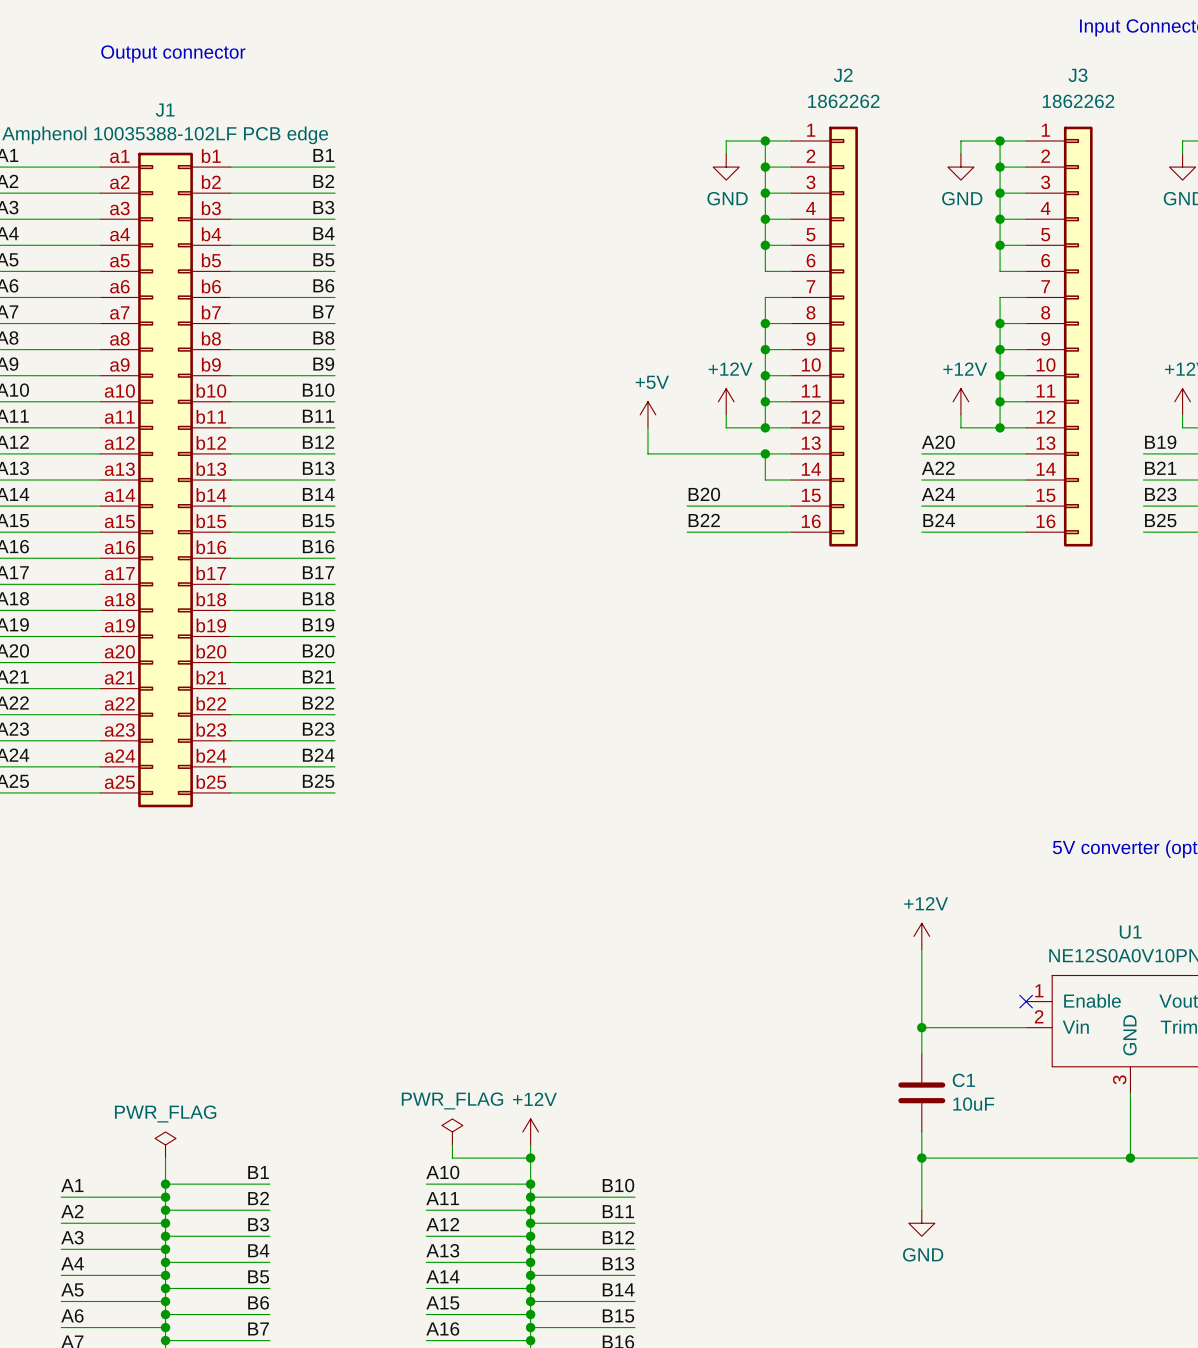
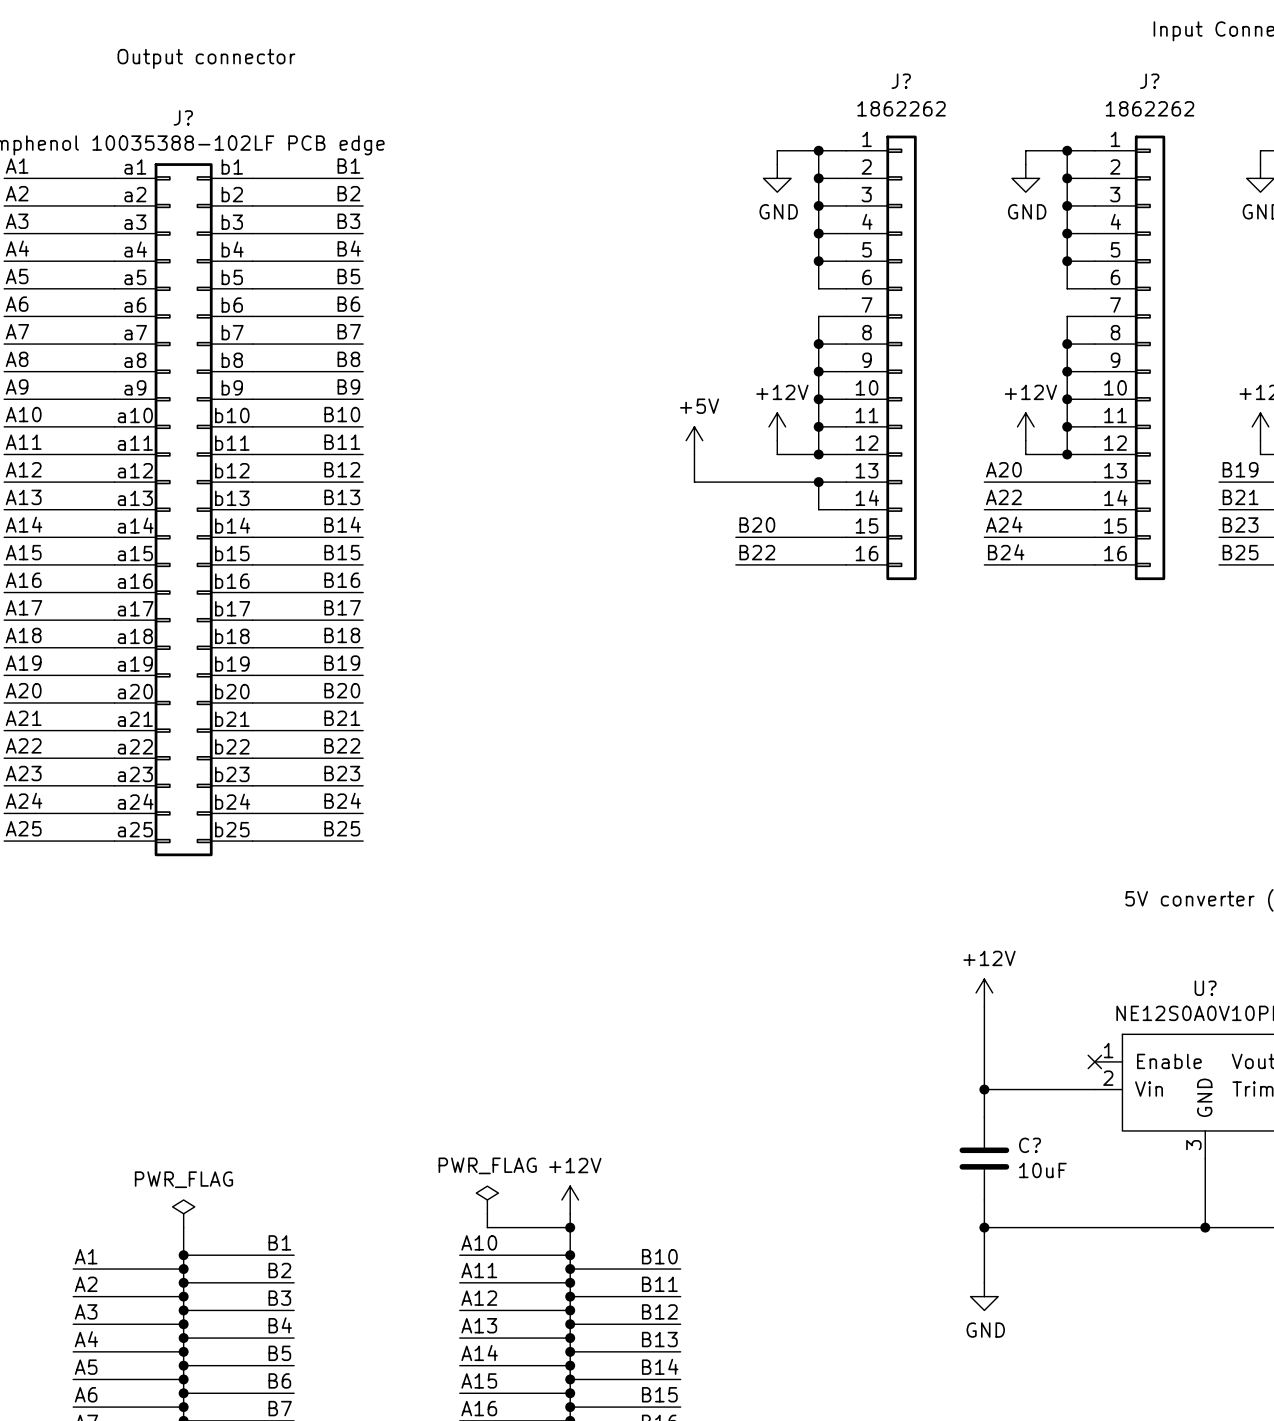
J2 name: J2 (843, 75) -> J? (901, 81)
J3 name: J3 (1078, 75) -> J? (1149, 81)
J1 name: J1 (165, 110) -> J? (183, 117)
U1 name: U1 (1130, 932) -> U? (1205, 988)
C1 name: C1 (963, 1080) -> C? (1030, 1145)

